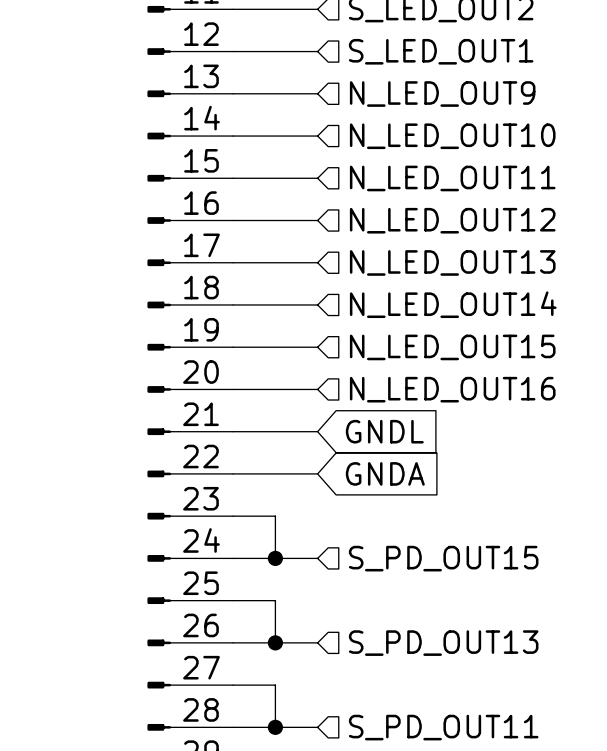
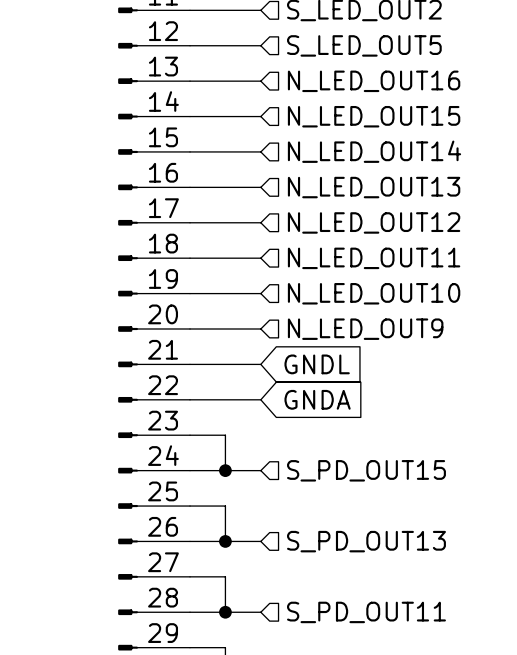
hierarchical label: S_LED_OUT1 (441, 51) -> S_LED_OUT5 (364, 45)
hierarchical label: N_LED_OUT9 (442, 94) -> N_LED_OUT16 (374, 81)
hierarchical label: N_LED_OUT10 (452, 136) -> N_LED_OUT15 (374, 116)
hierarchical label: N_LED_OUT11 (452, 178) -> N_LED_OUT14 (374, 151)
hierarchical label: N_LED_OUT12 (452, 220) -> N_LED_OUT13 (374, 187)
hierarchical label: N_LED_OUT13 (452, 262) -> N_LED_OUT12 (374, 222)
hierarchical label: N_LED_OUT14 (453, 304) -> N_LED_OUT11 (374, 258)
hierarchical label: N_LED_OUT15 (452, 347) -> N_LED_OUT10 (374, 293)
hierarchical label: N_LED_OUT16 (452, 389) -> N_LED_OUT9 (365, 329)

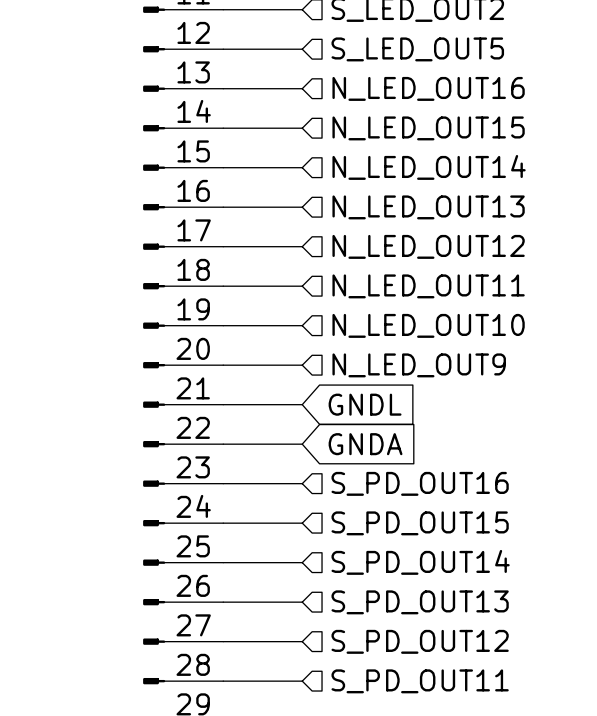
wire: (225, 435) (225, 470) -> (262, 483) (302, 483)
hierarchical label: none -> S_PD_OUT16 (420, 483)
junction: (225, 470) -> none
hierarchical label: none -> S_PD_OUT14 (420, 562)
wire: (225, 506) (225, 541) -> (262, 562) (302, 562)
junction: (225, 541) -> none
wire: (225, 576) (225, 612) -> (262, 641) (302, 641)
hierarchical label: none -> S_PD_OUT12 (420, 641)
junction: (225, 612) -> none

